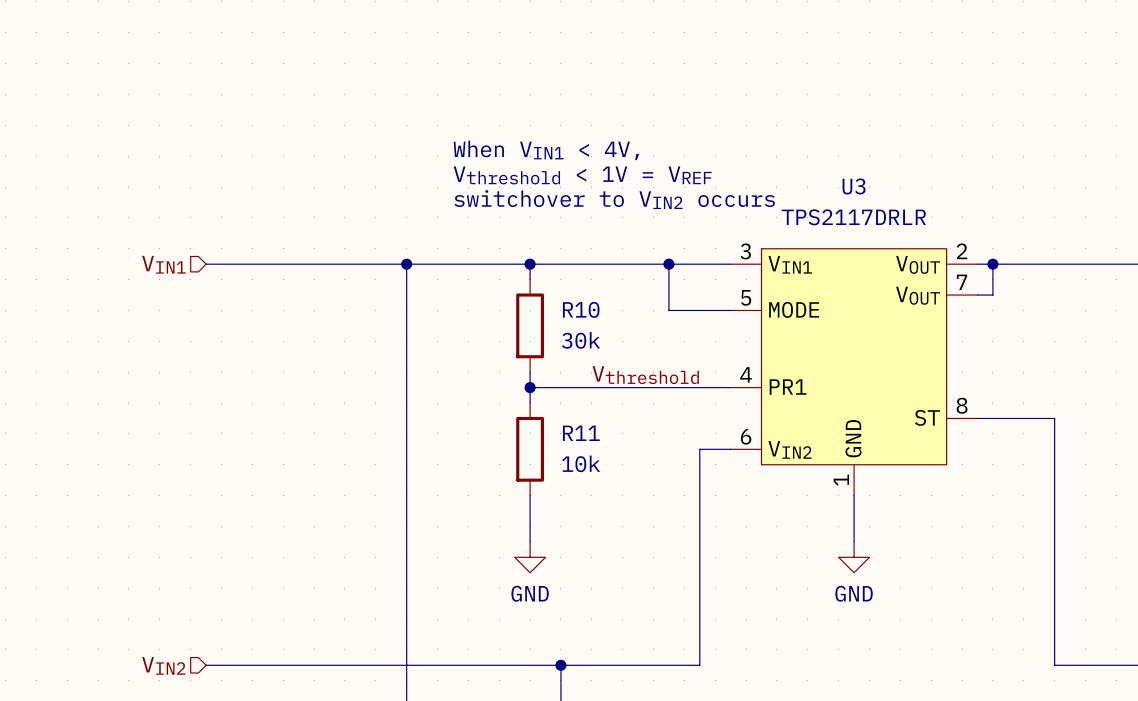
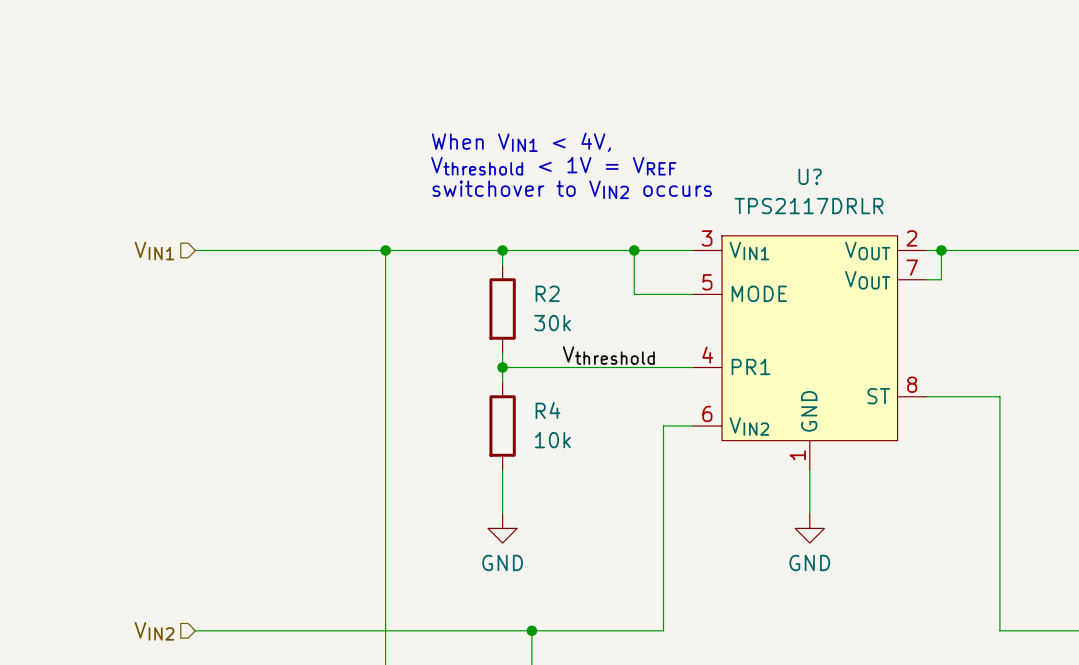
U3 name: U3 (854, 186) -> U? (810, 176)
R10 name: R10 (581, 309) -> R2 (547, 293)
R11 name: R11 (581, 433) -> R4 (548, 410)

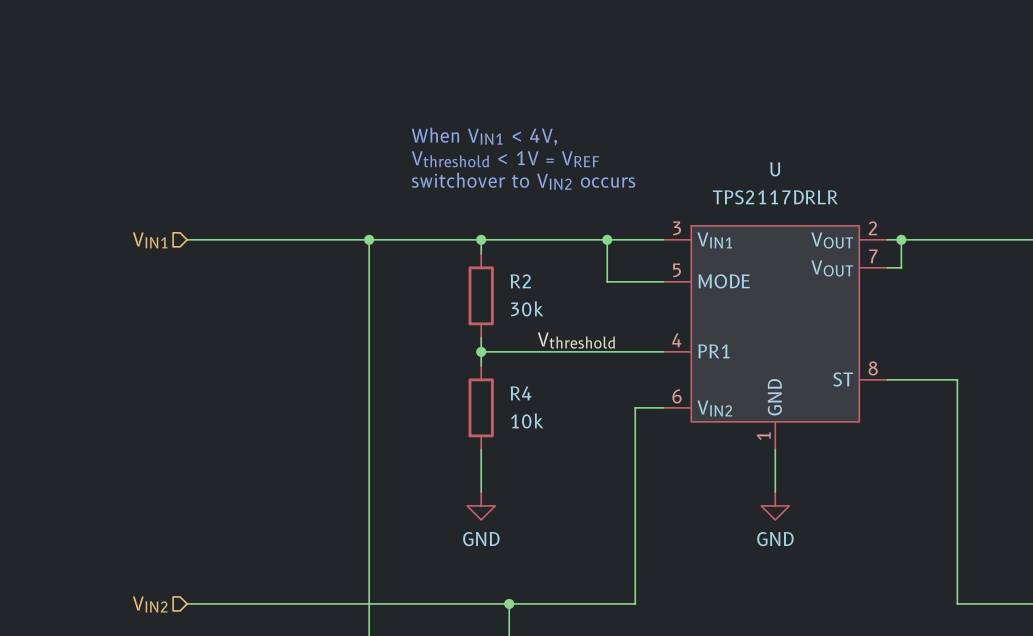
U? name: U? (810, 176) -> U (775, 169)

